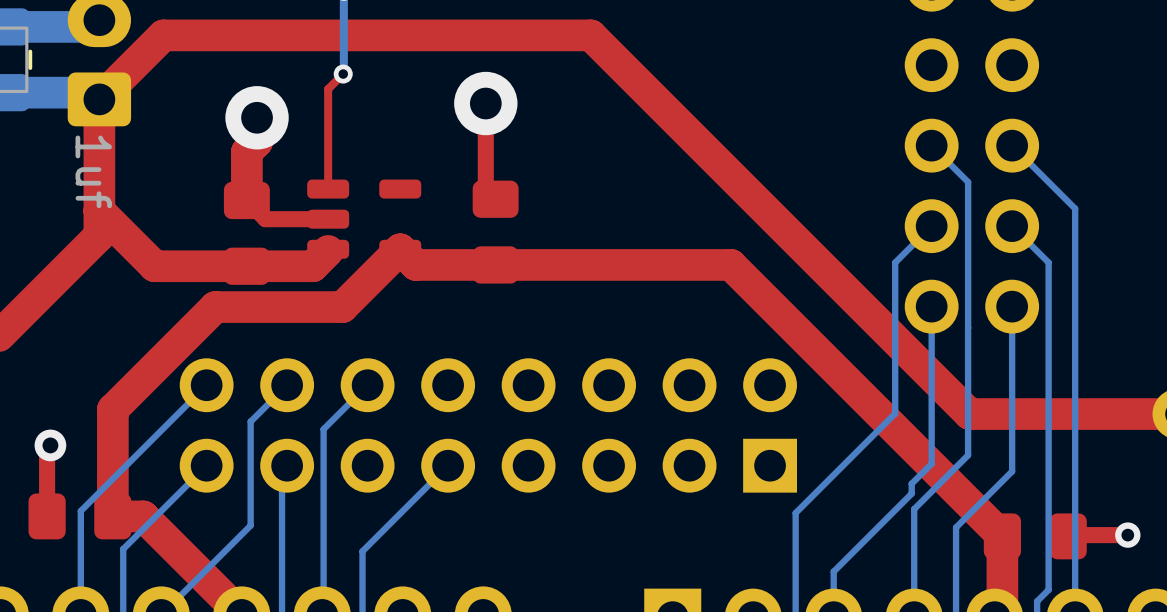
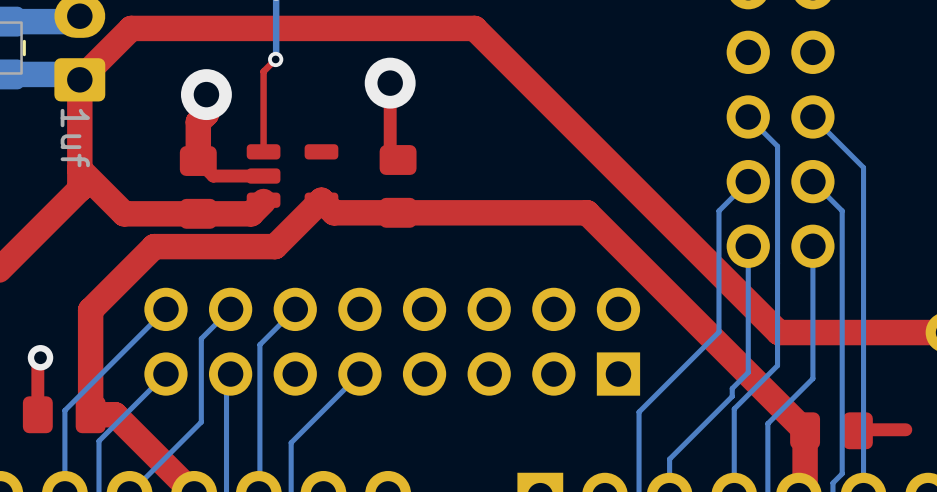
top track: (215, 307) (112, 409) -> (172, 246) (154, 246) (90, 310) (90, 328)
via: (1127, 535) -> none

